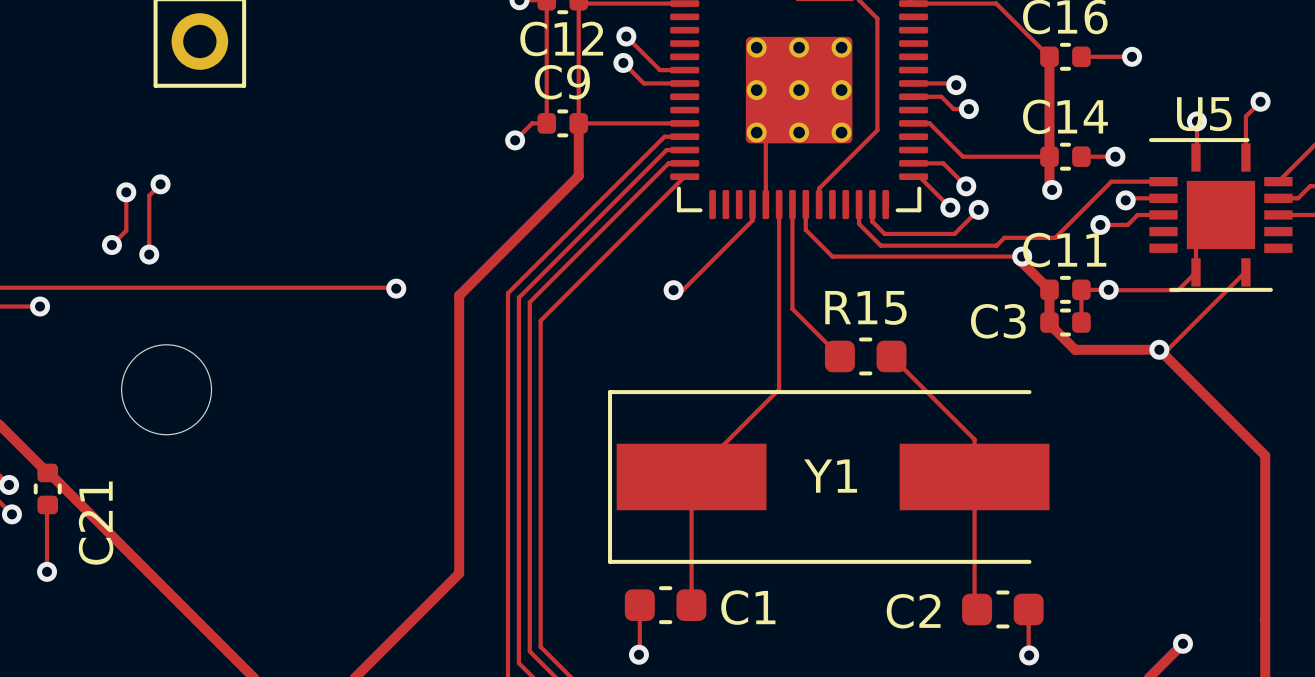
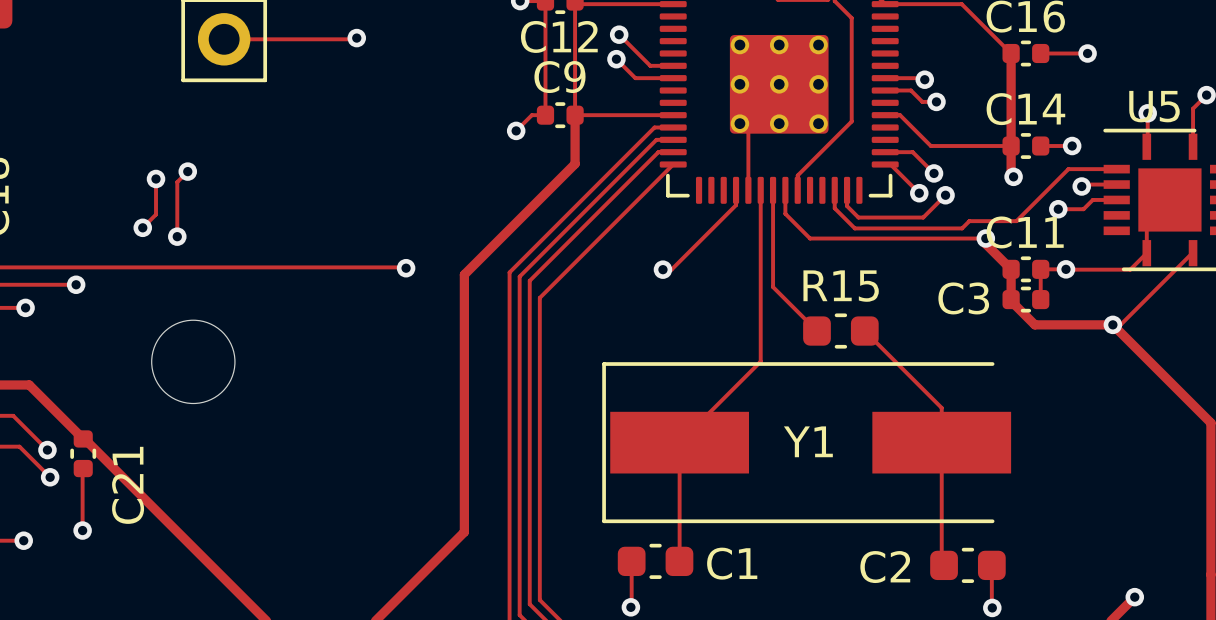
track: none -> (356, 38) (224, 39)
via: none -> (356, 38)

